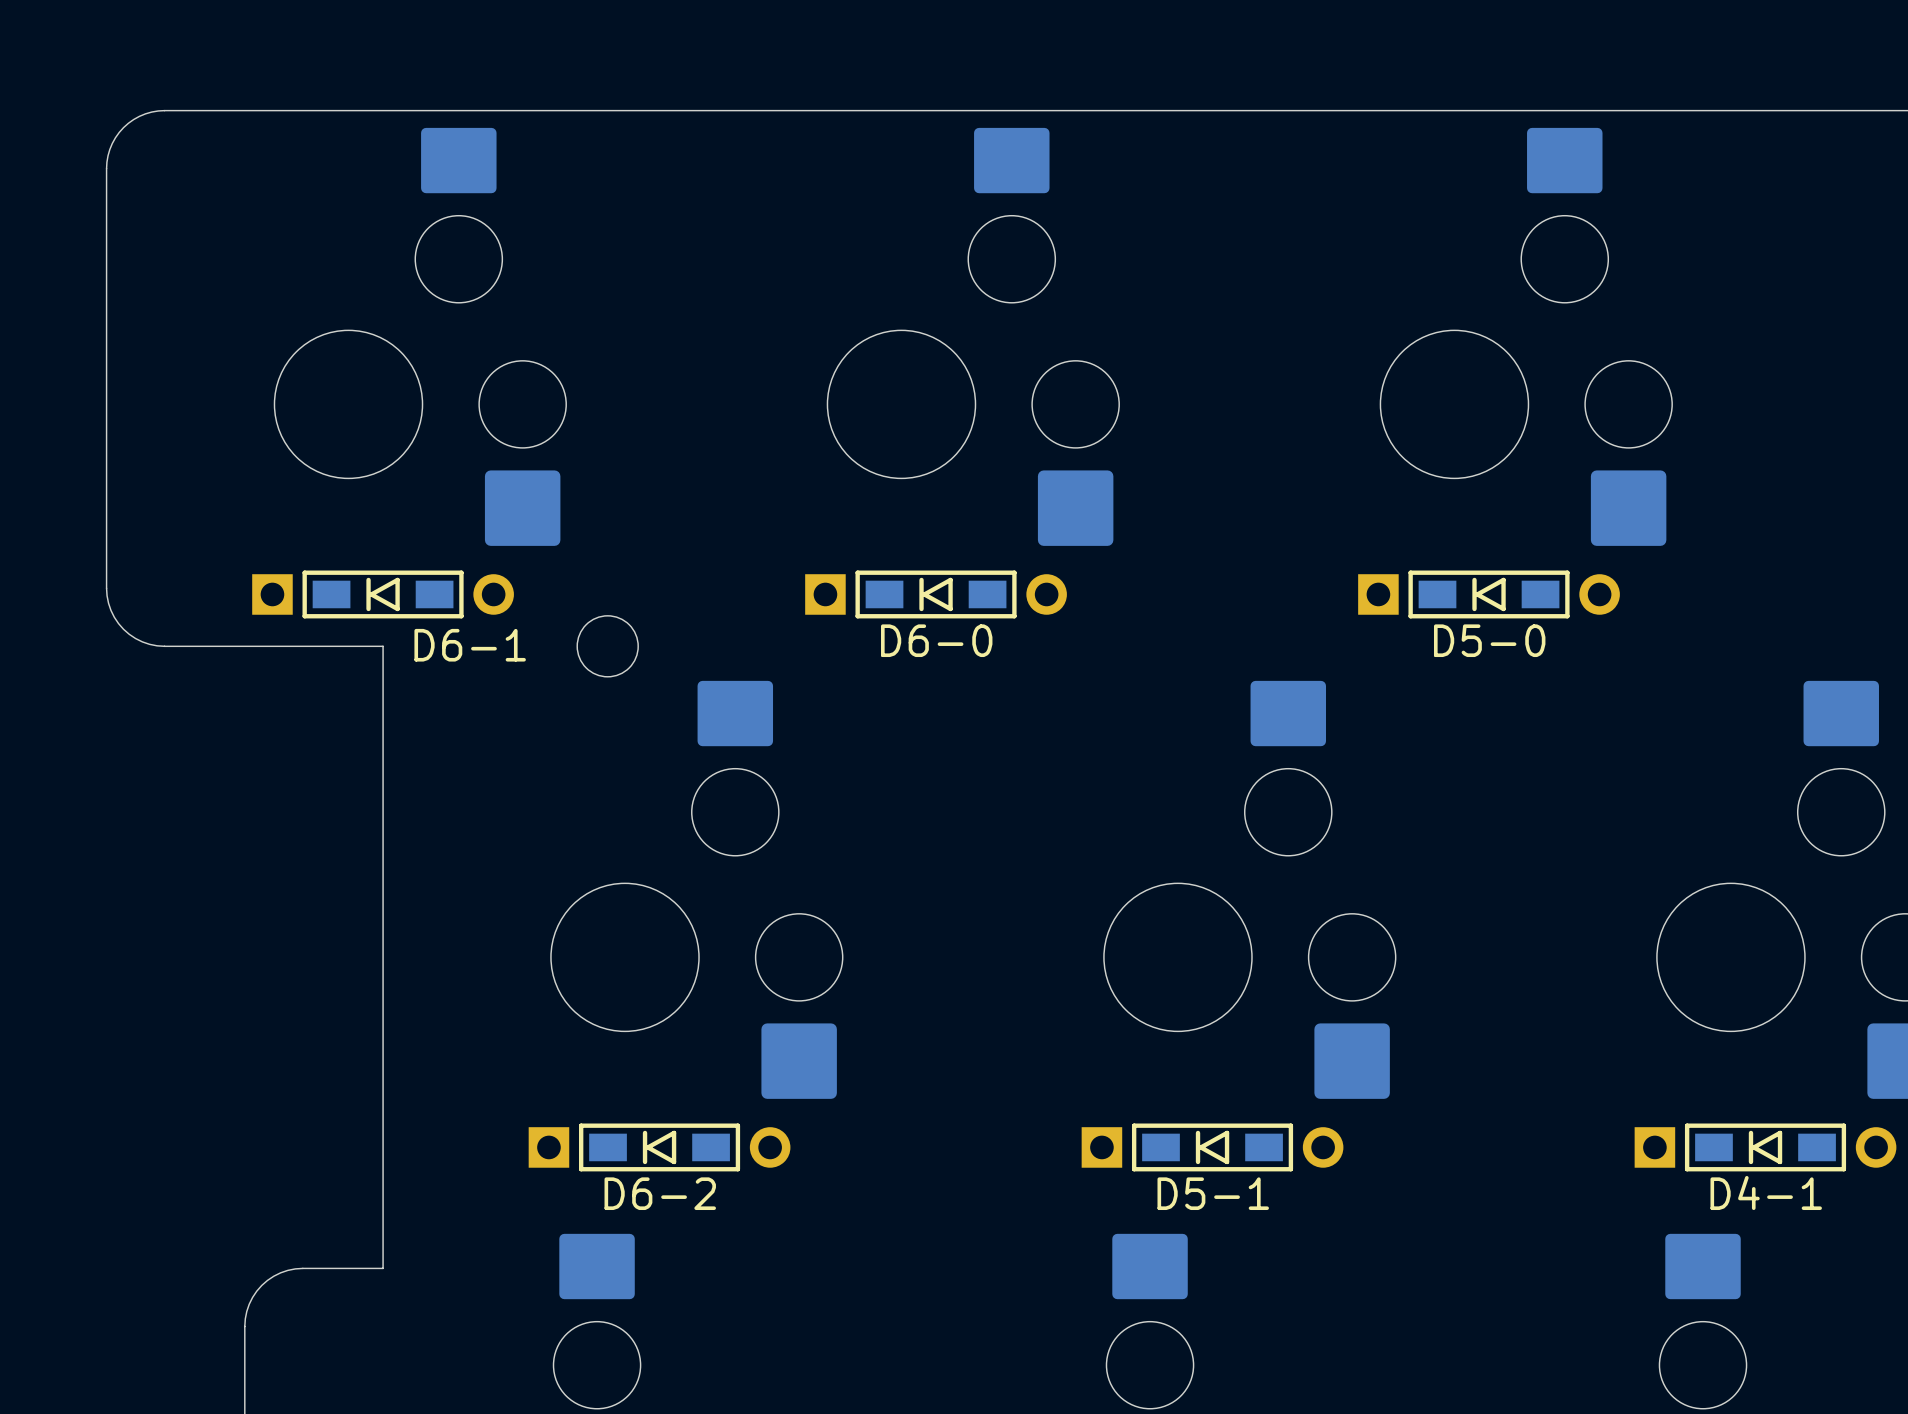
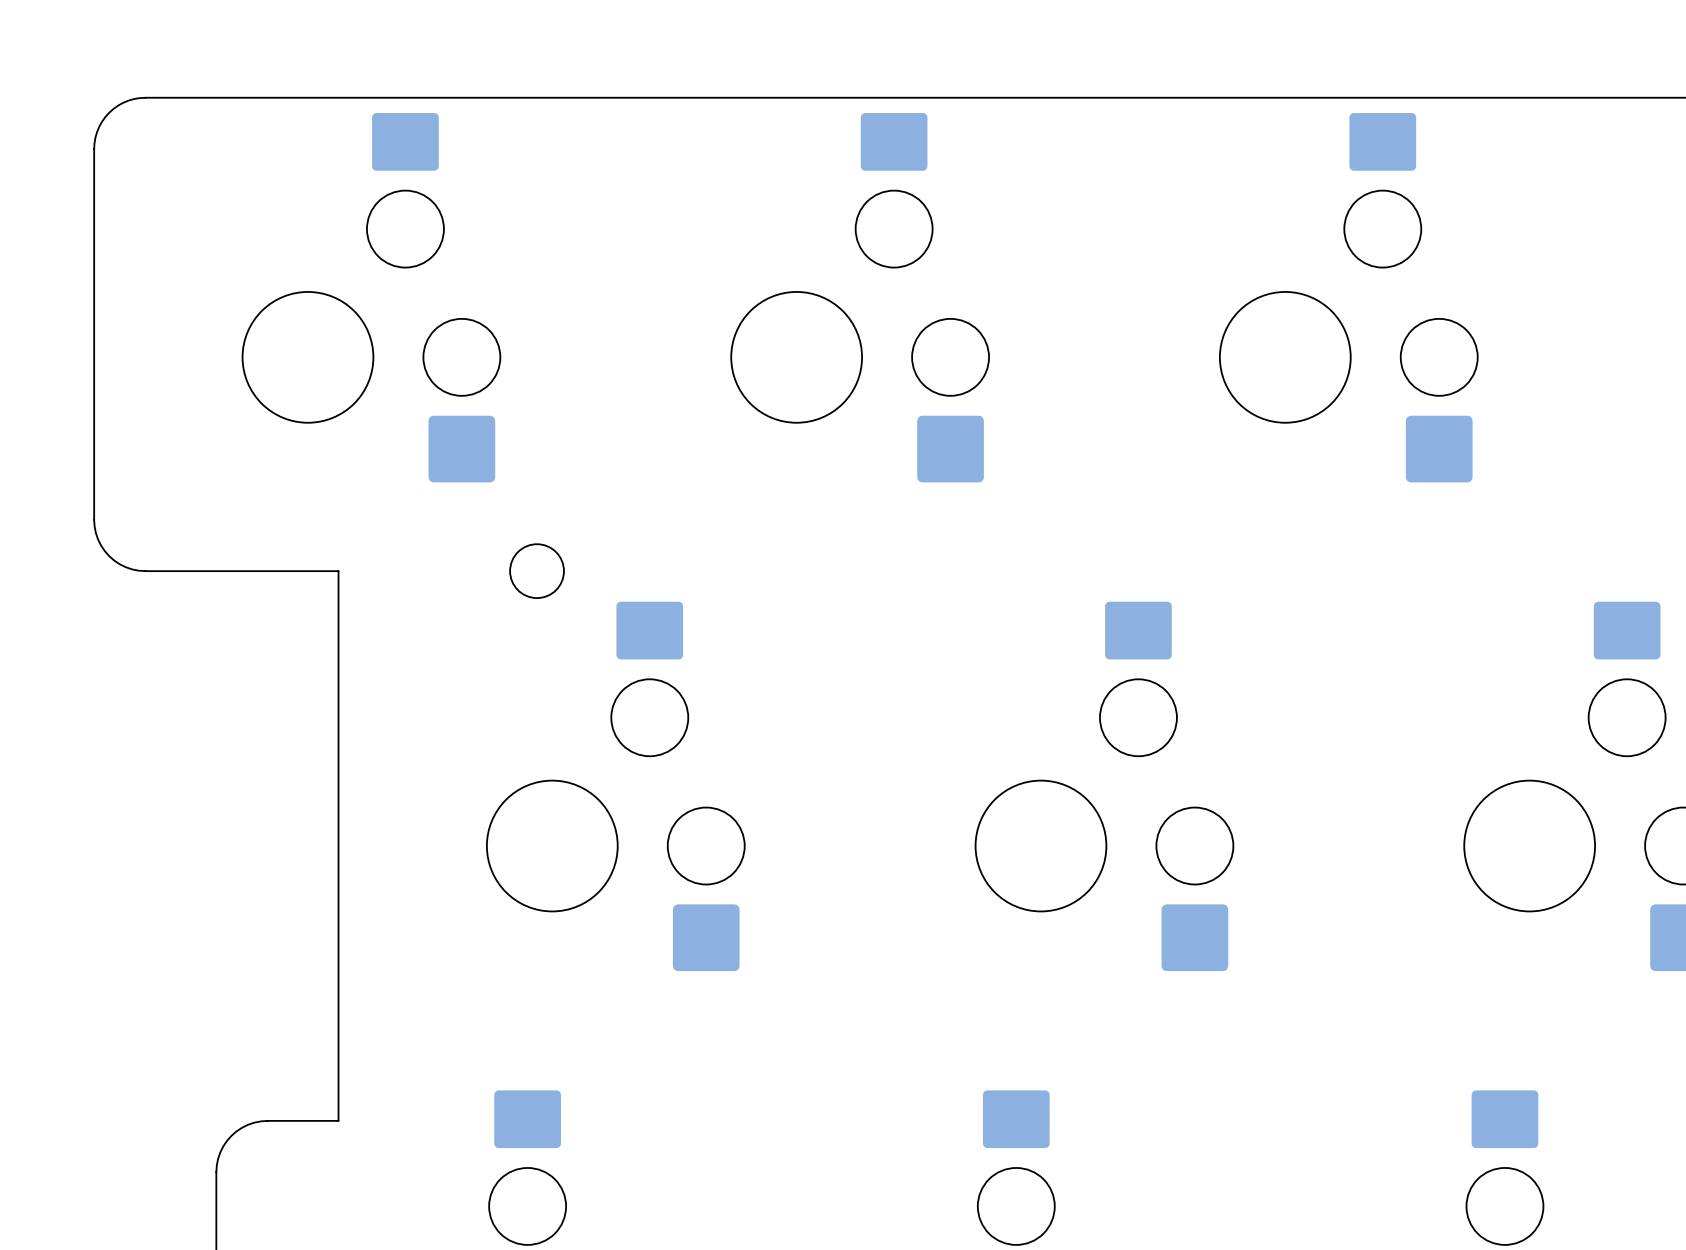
D6-1: (383, 594) -> none
D6-0: (936, 594) -> none
D5-0: (1489, 594) -> none
D6-2: (659, 1147) -> none
D5-1: (1212, 1147) -> none
D4-1: (1765, 1147) -> none

